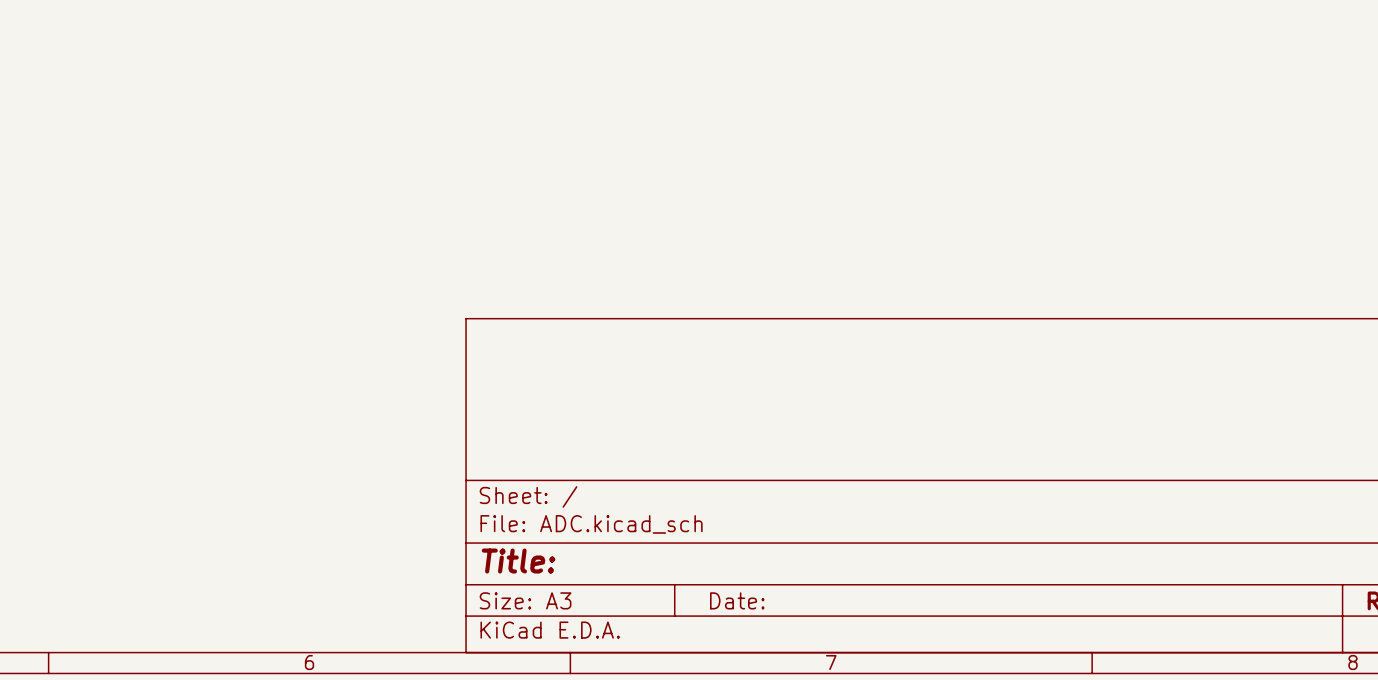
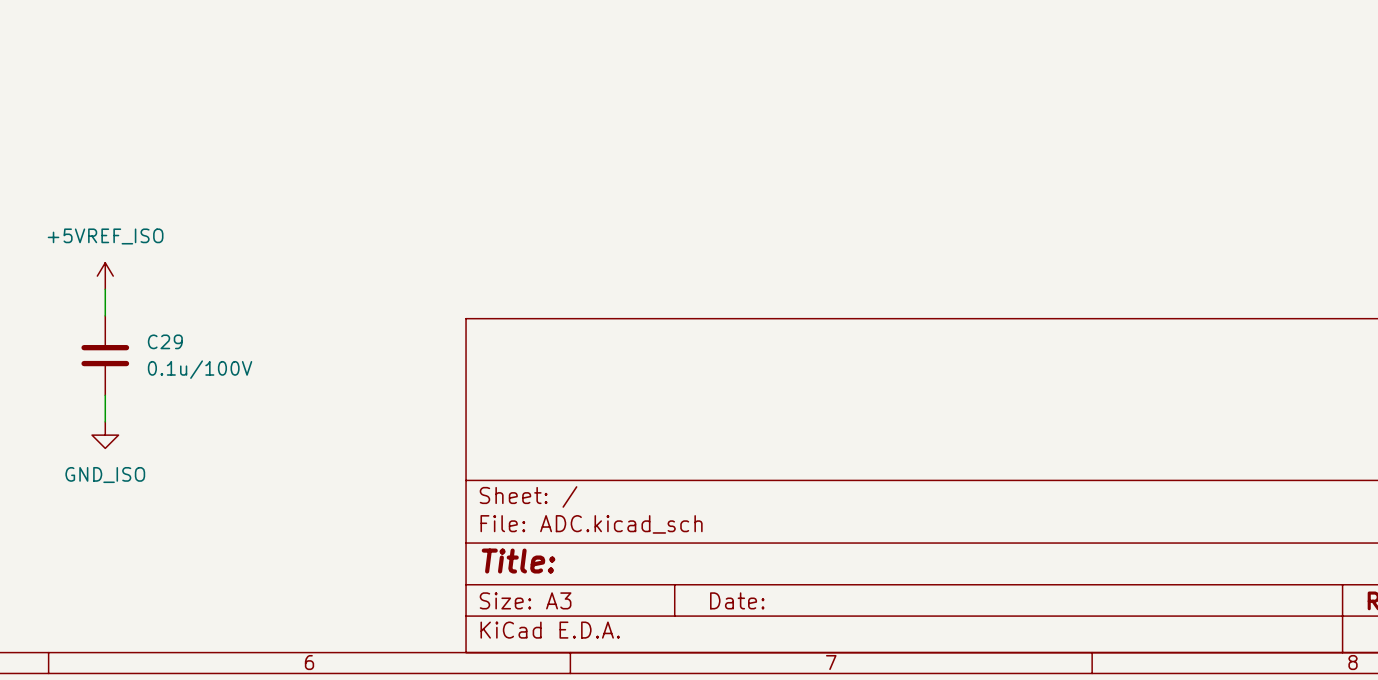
power symbol: none -> +5VREF_ISO (105, 276)
wire: none -> (105, 289) (105, 315)
C29: none -> 0.1u/100V (105, 355)
wire: none -> (105, 395) (105, 421)
power symbol: none -> GND_ISO (105, 435)

